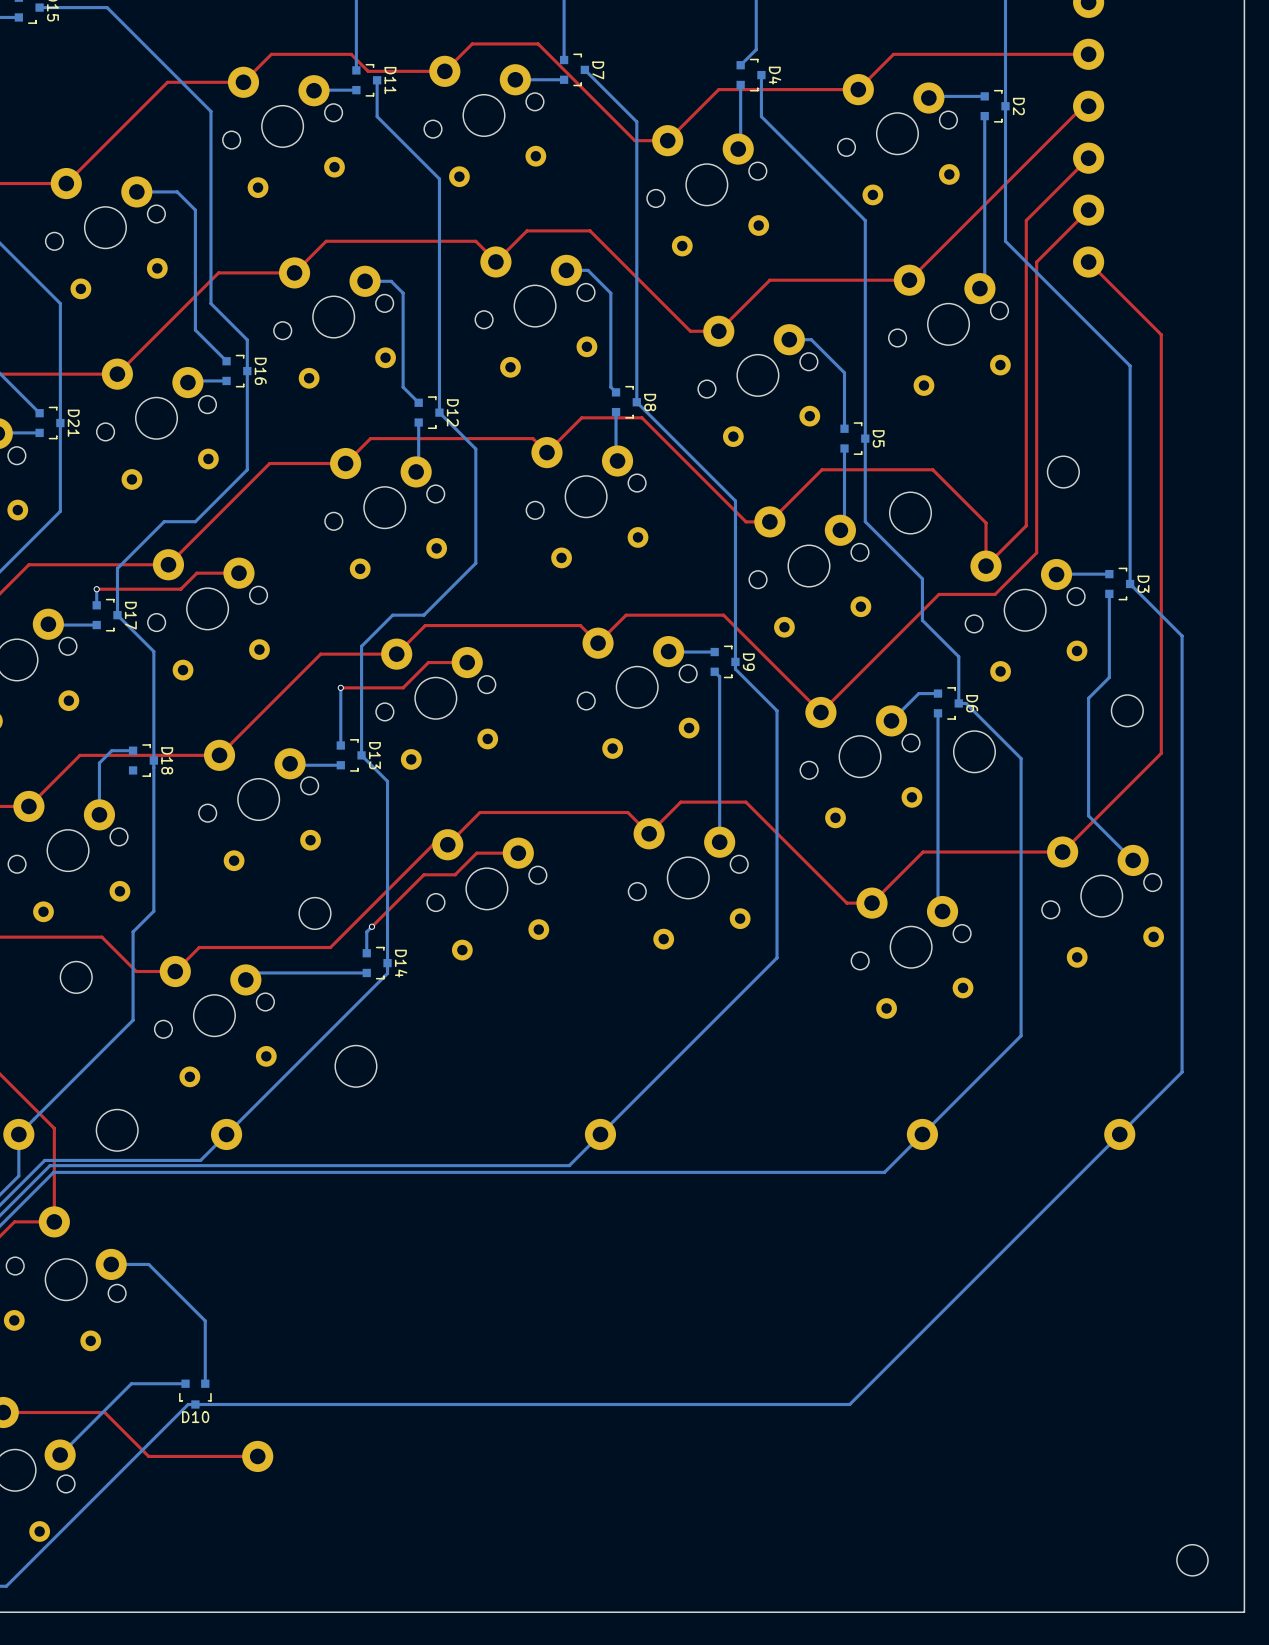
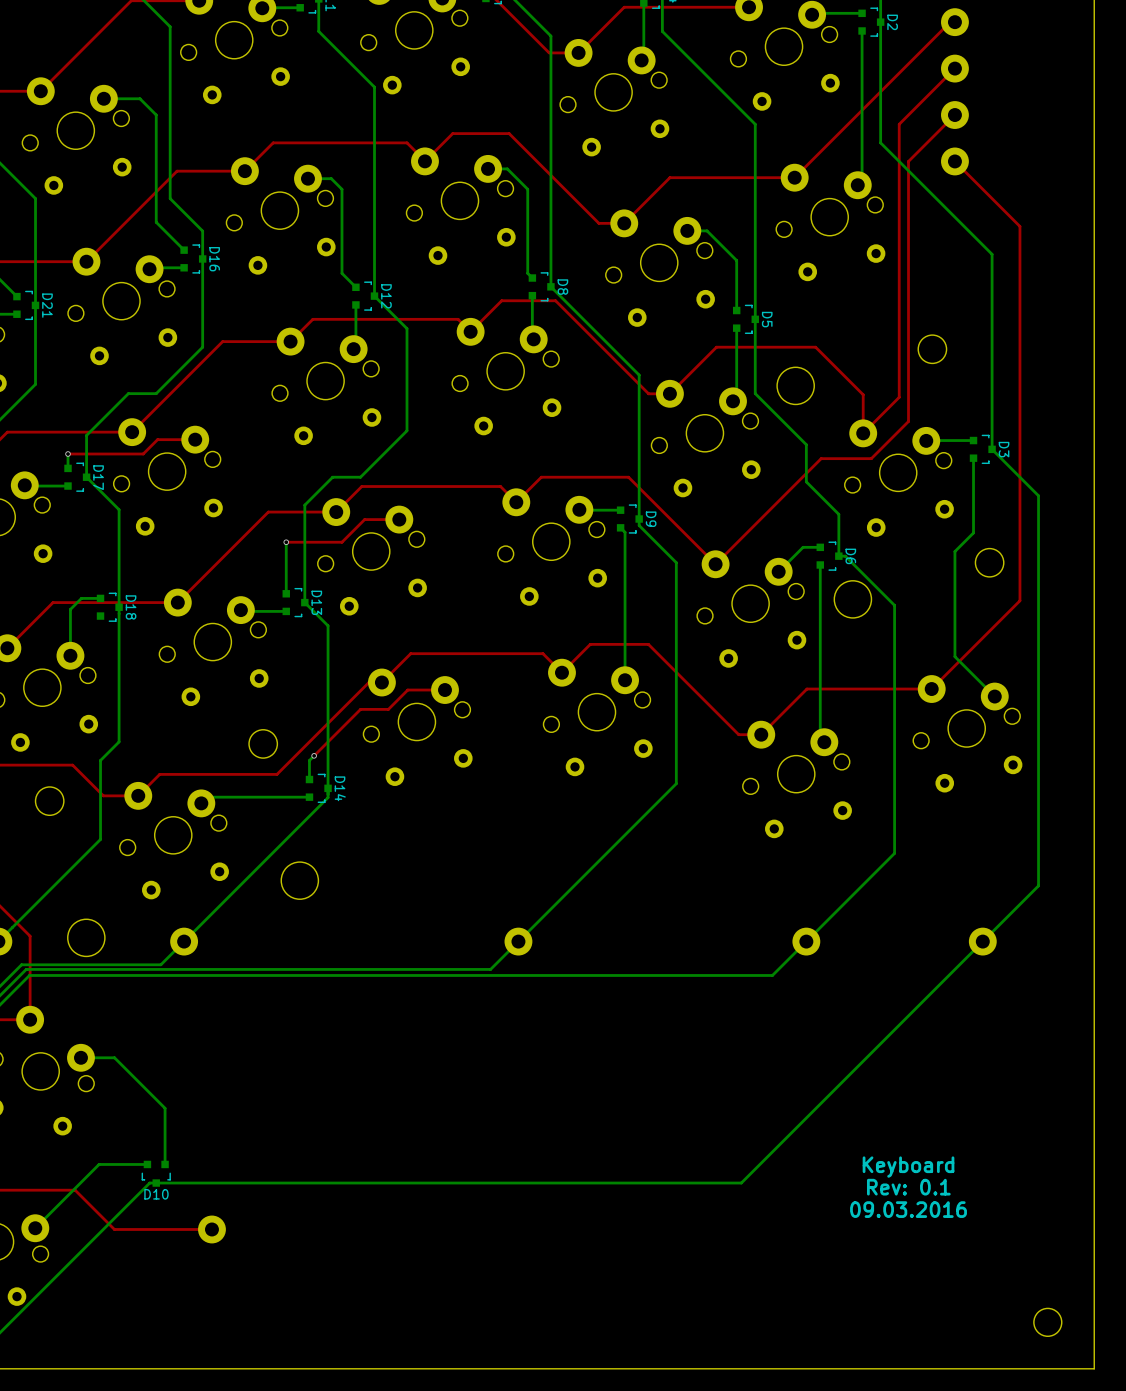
text: none -> Keyboard (908, 1167)
text: none -> Rev: 0.1 (908, 1187)
text: none -> 09.03.2016 (908, 1209)

